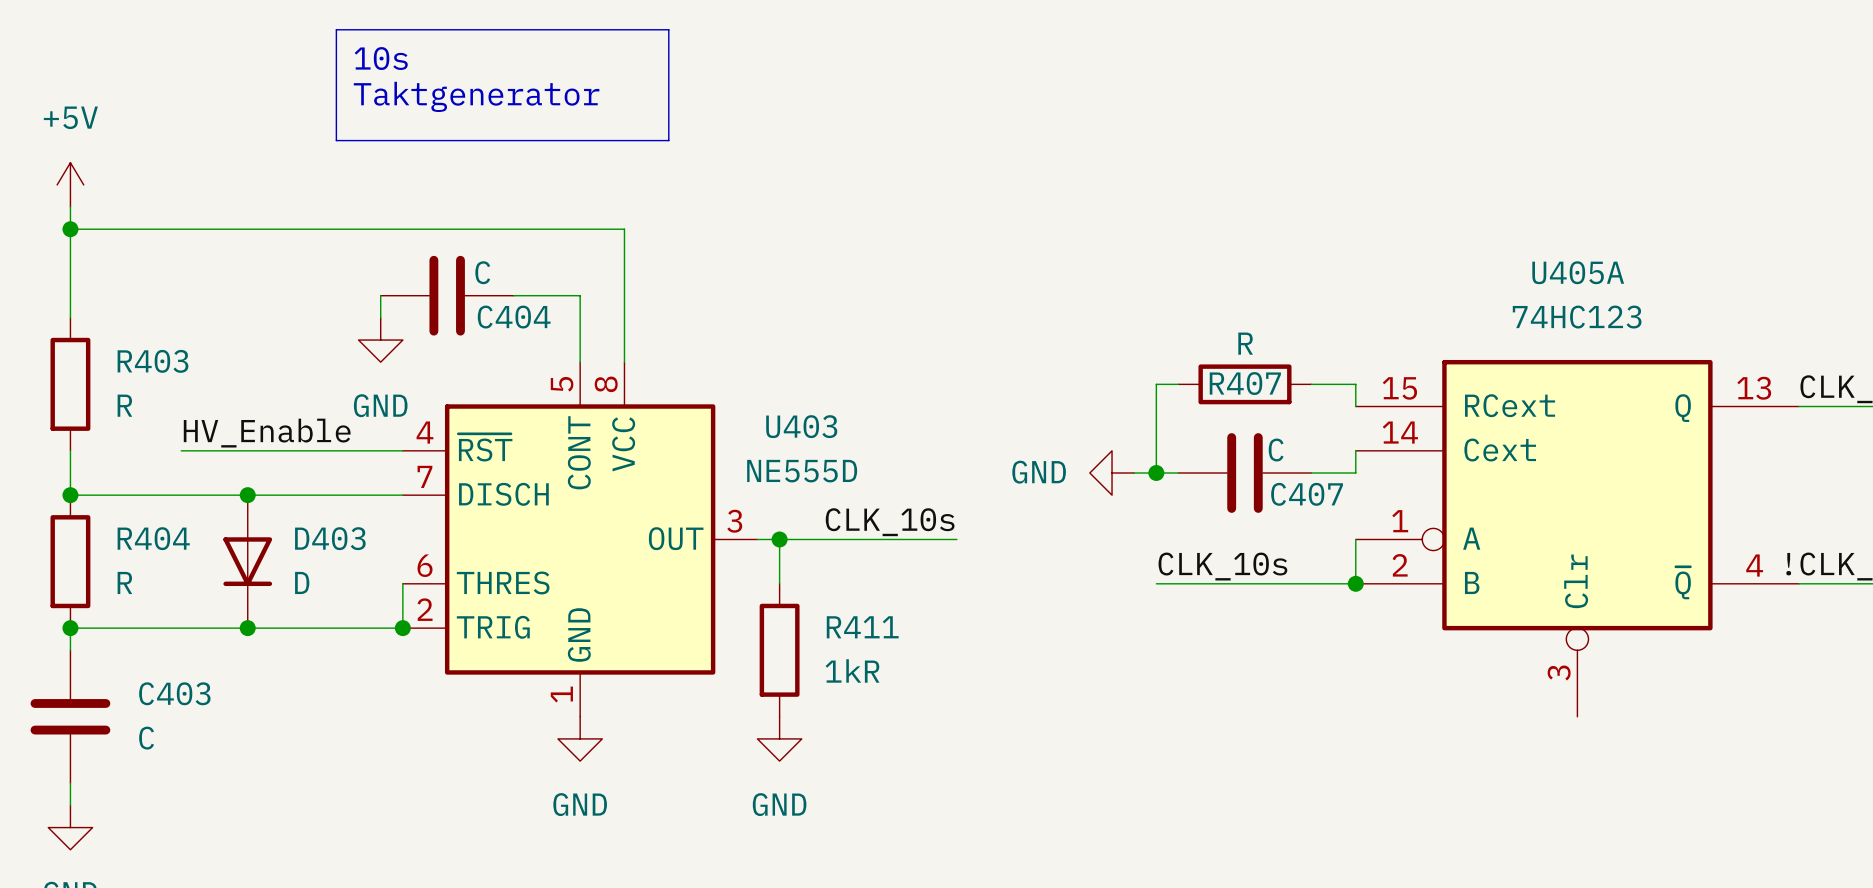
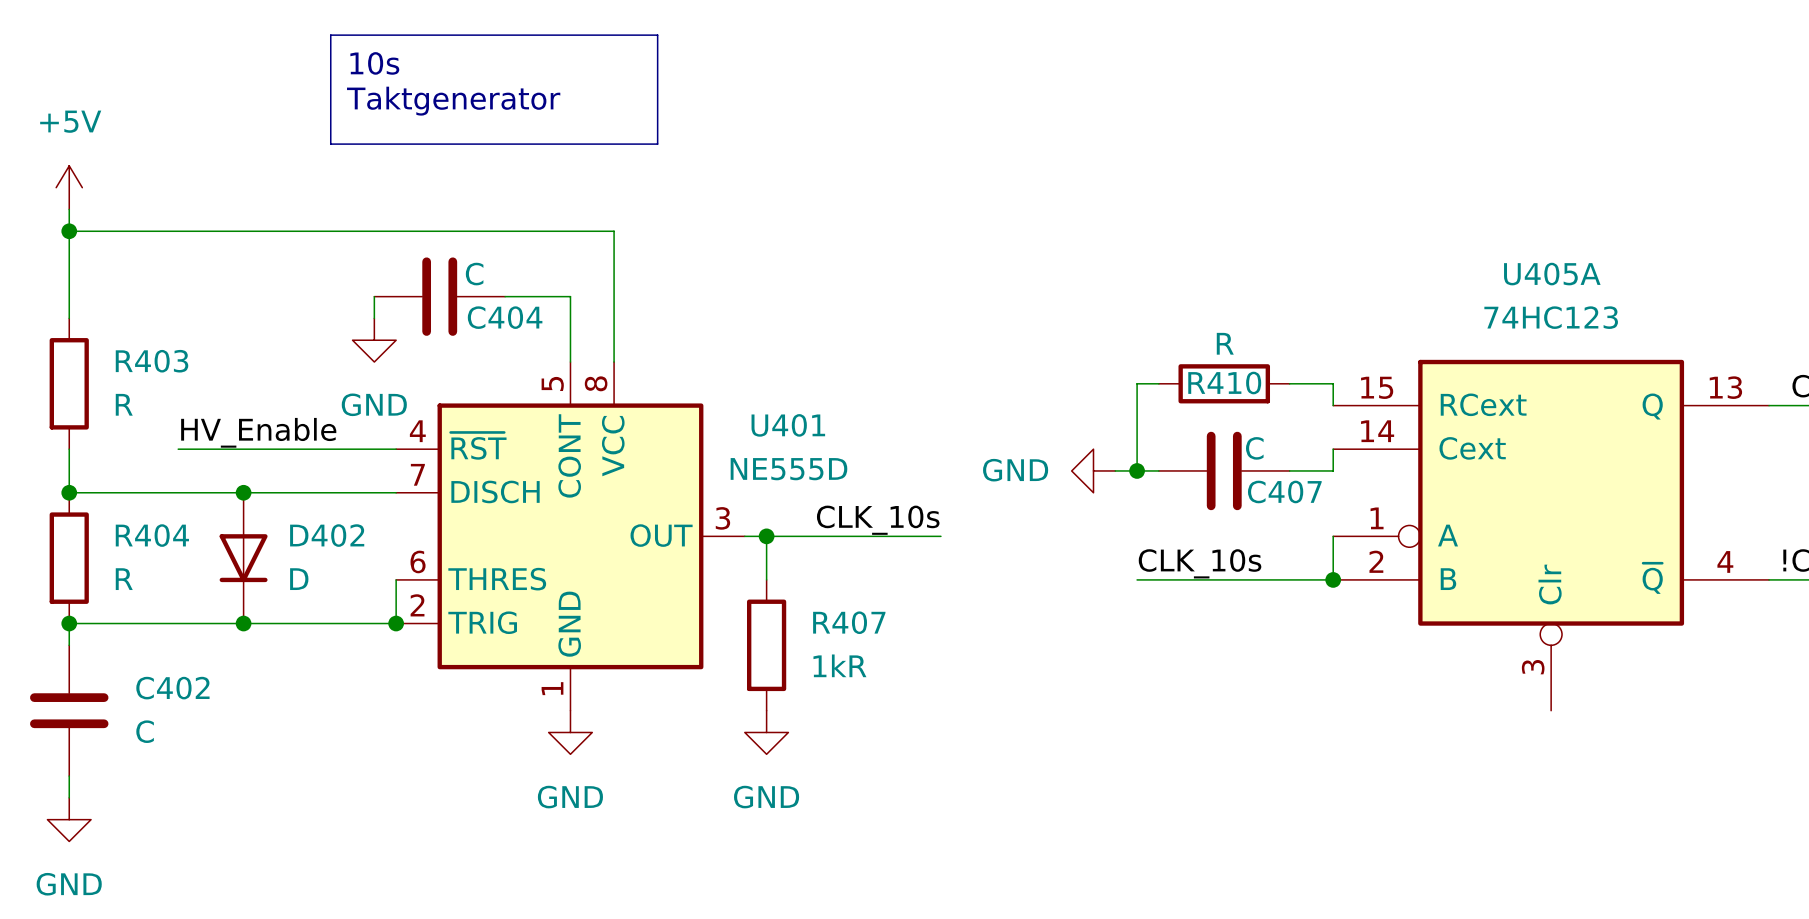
R407 name: R407 (1245, 383) -> R410 (1224, 383)
U403 name: U403 (801, 426) -> U401 (788, 425)
D403 name: D403 (330, 538) -> D402 (327, 535)
R411 name: R411 (862, 627) -> R407 (849, 622)
C403 name: C403 (174, 693) -> C402 (172, 688)

